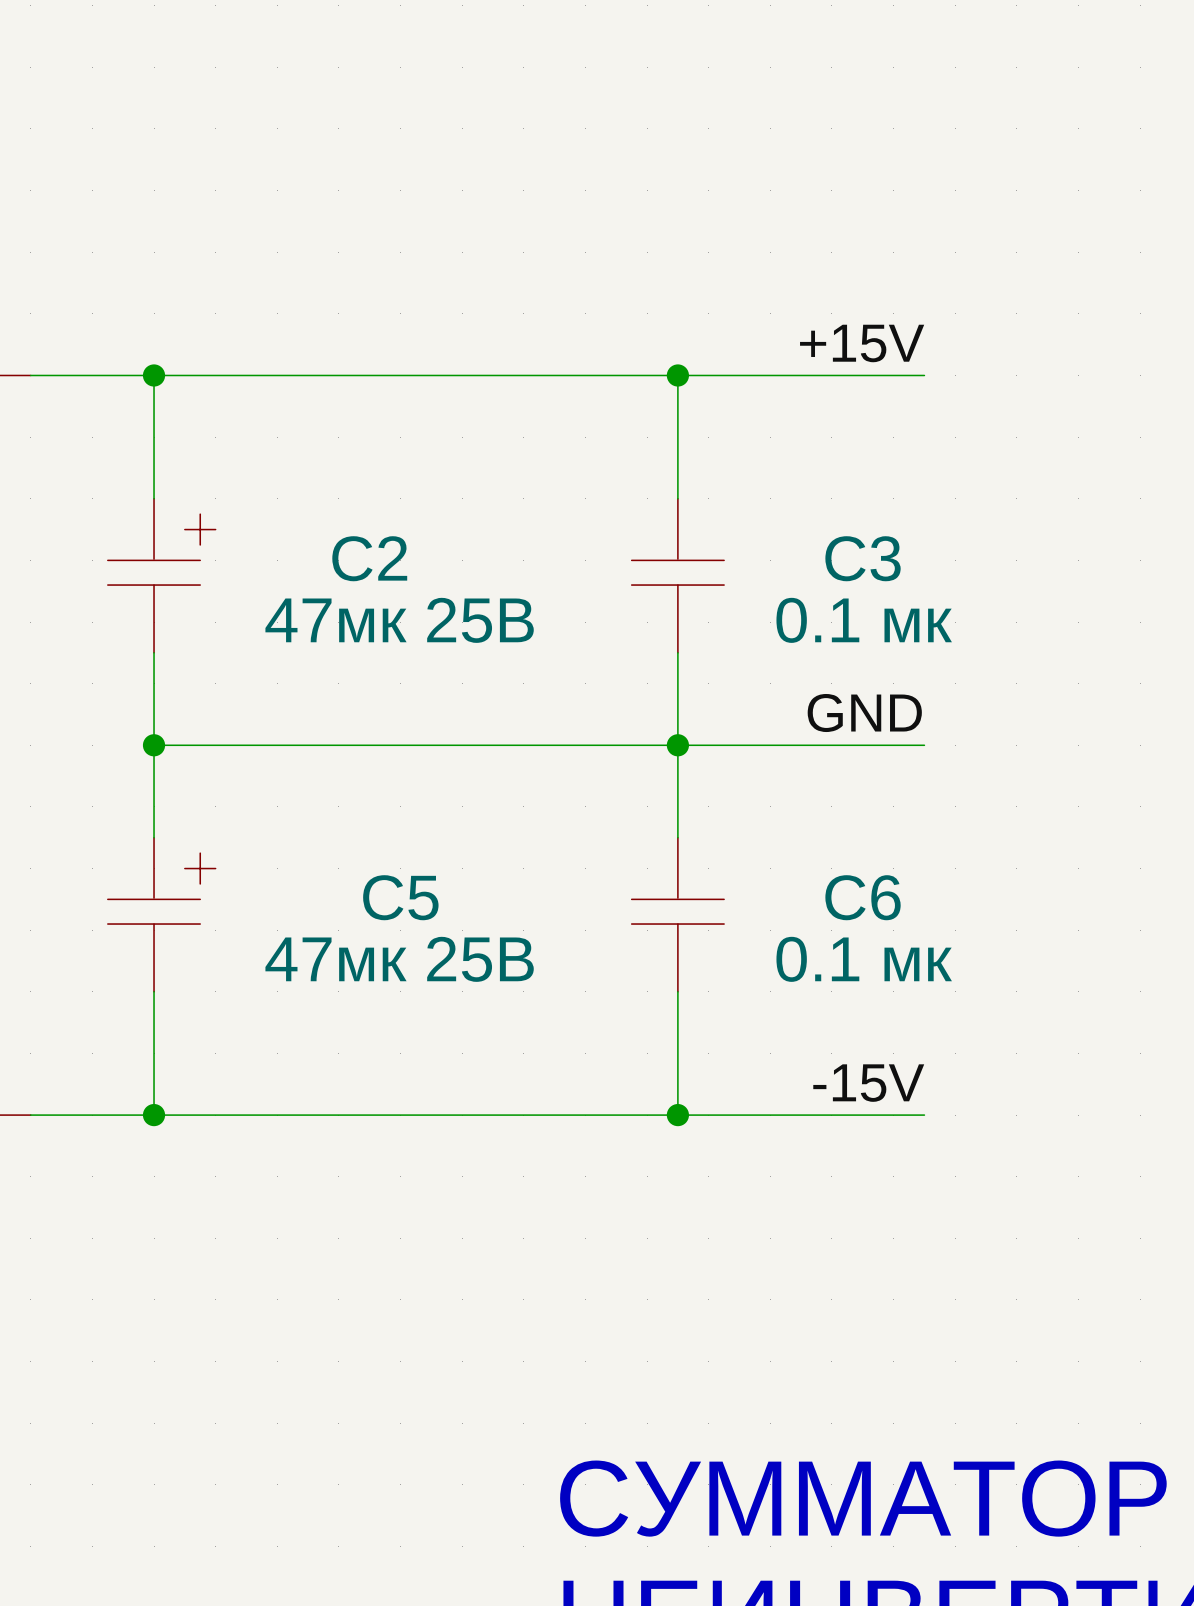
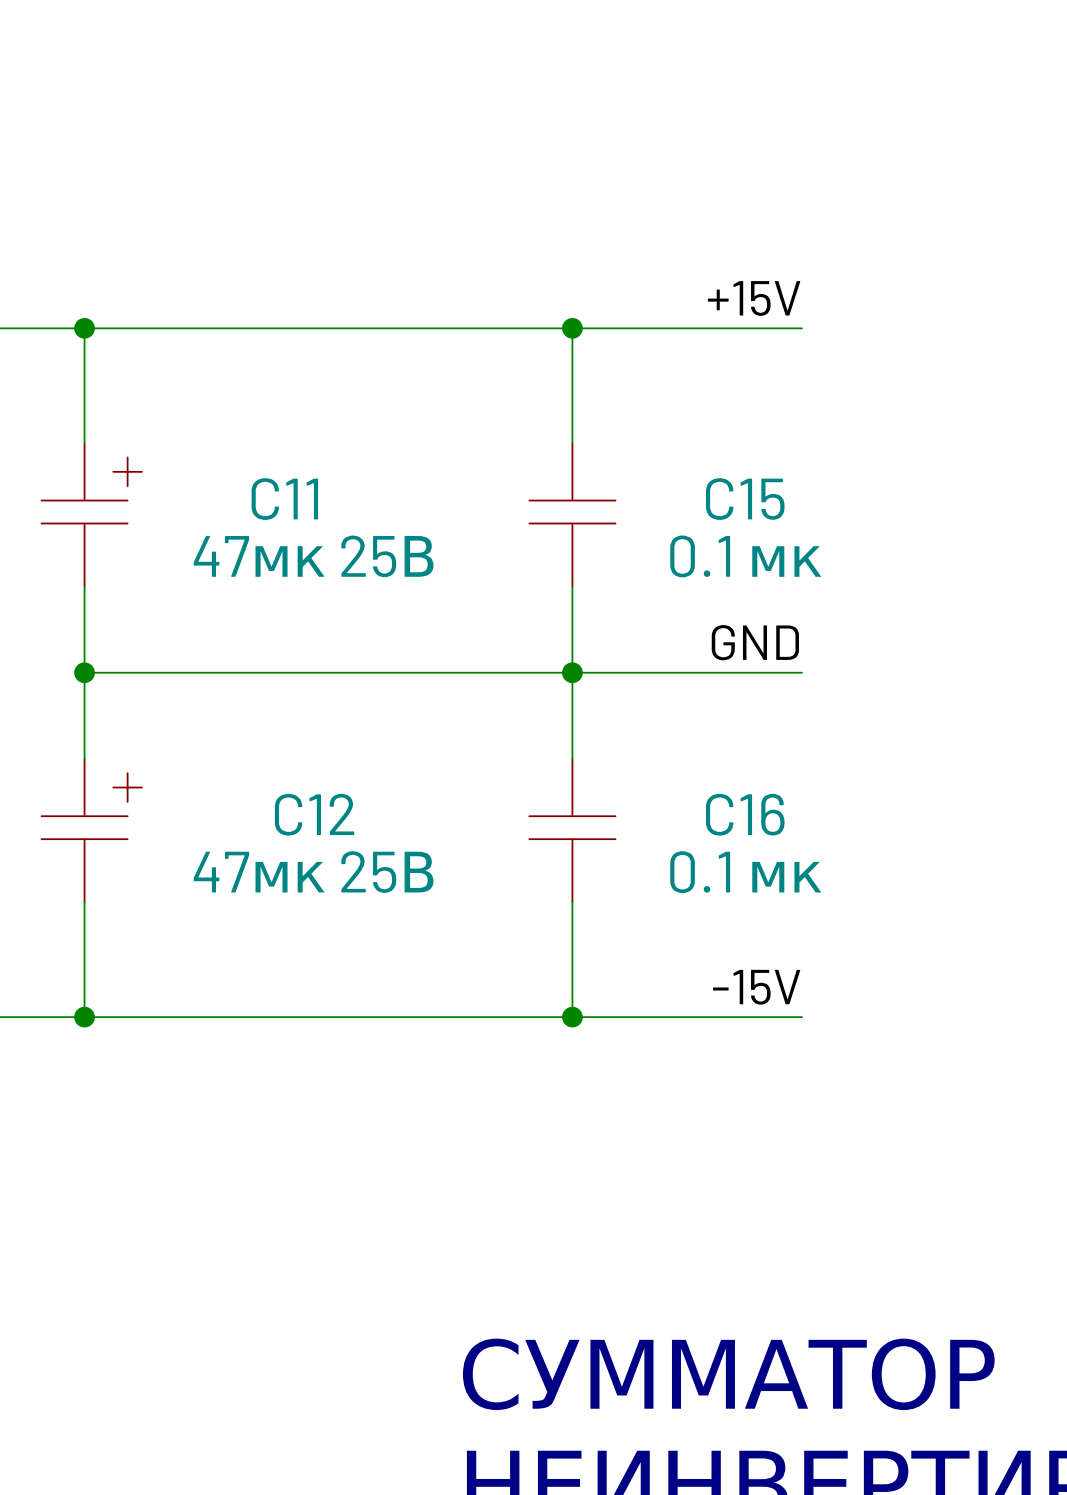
C2 name: C2 (369, 558) -> C11 (284, 499)
C3 name: C3 (863, 558) -> C15 (745, 499)
C5 name: C5 (400, 897) -> C12 (314, 814)
C6 name: C6 (863, 897) -> C16 (745, 814)

